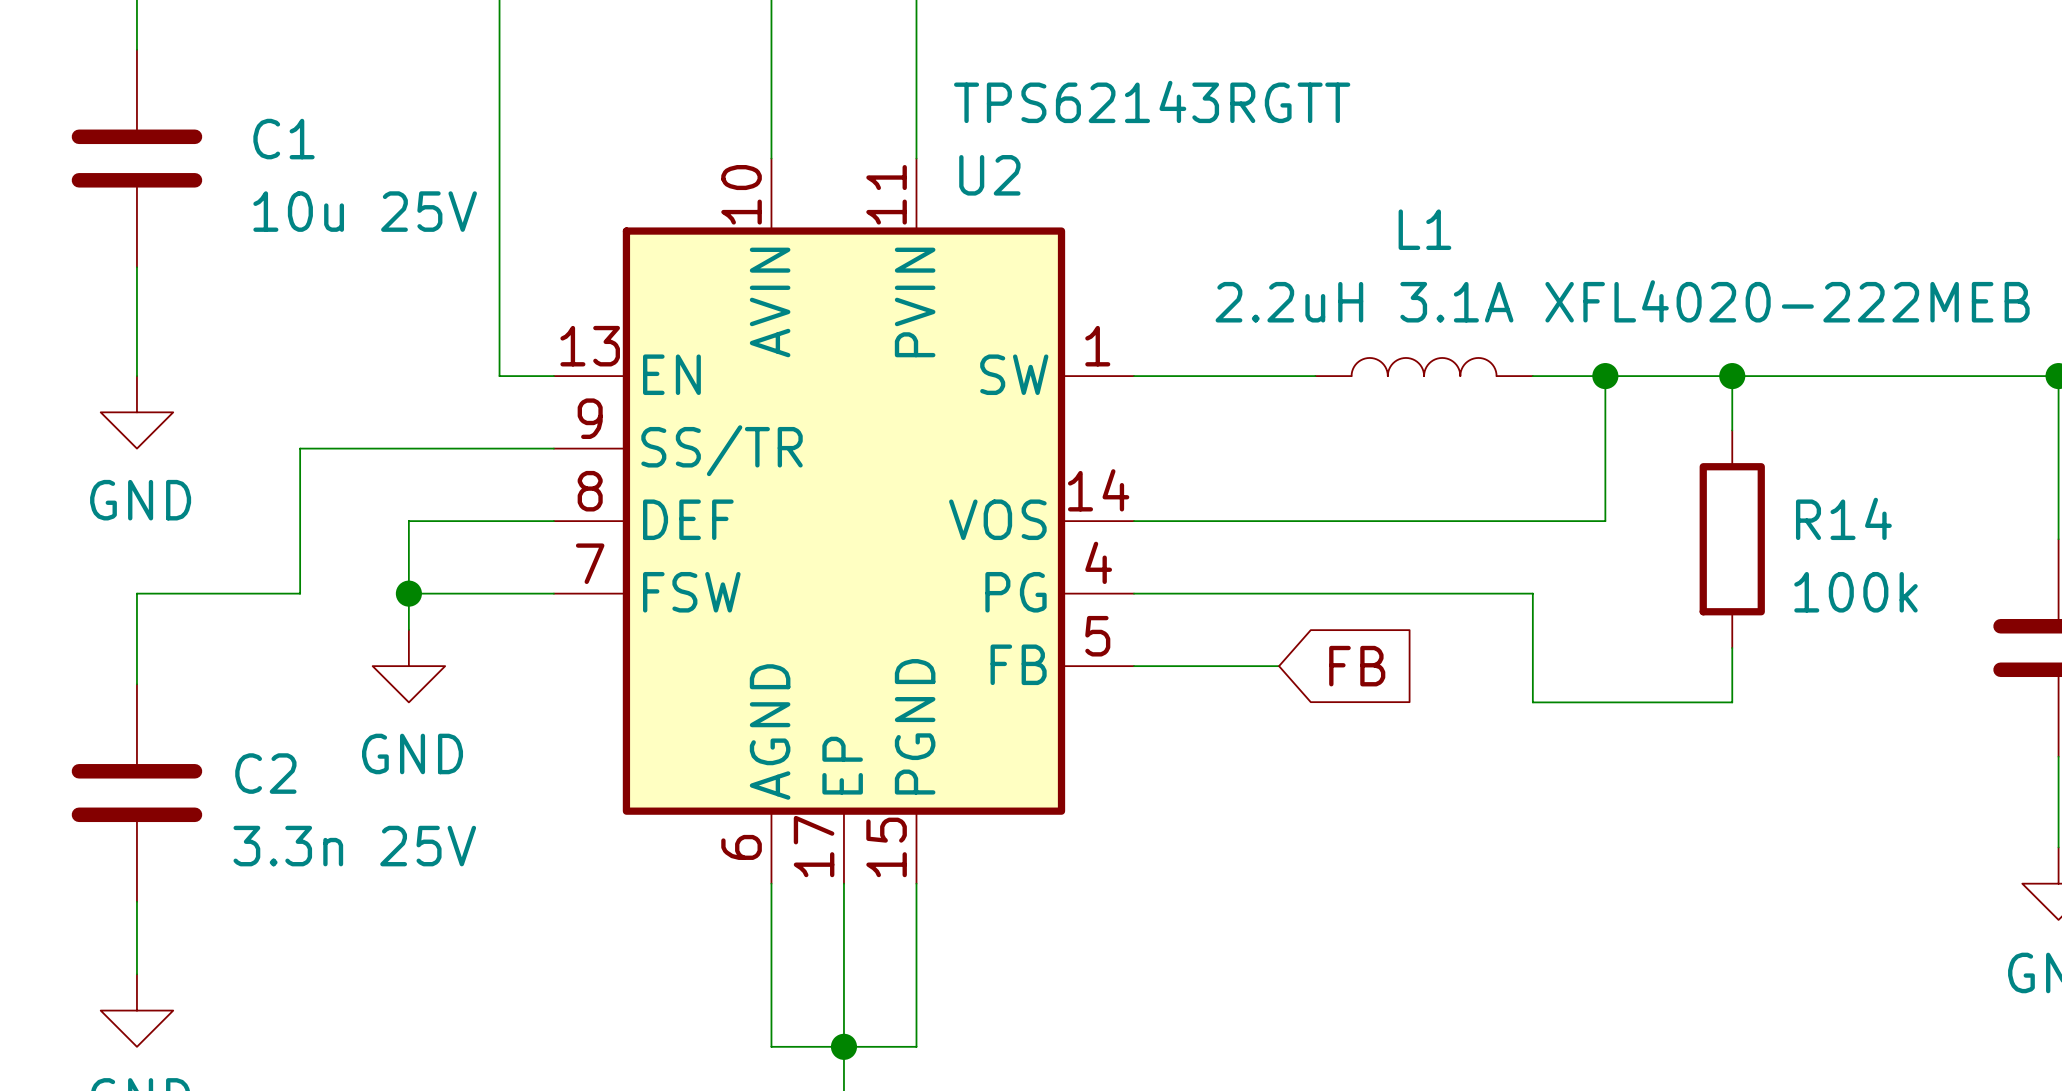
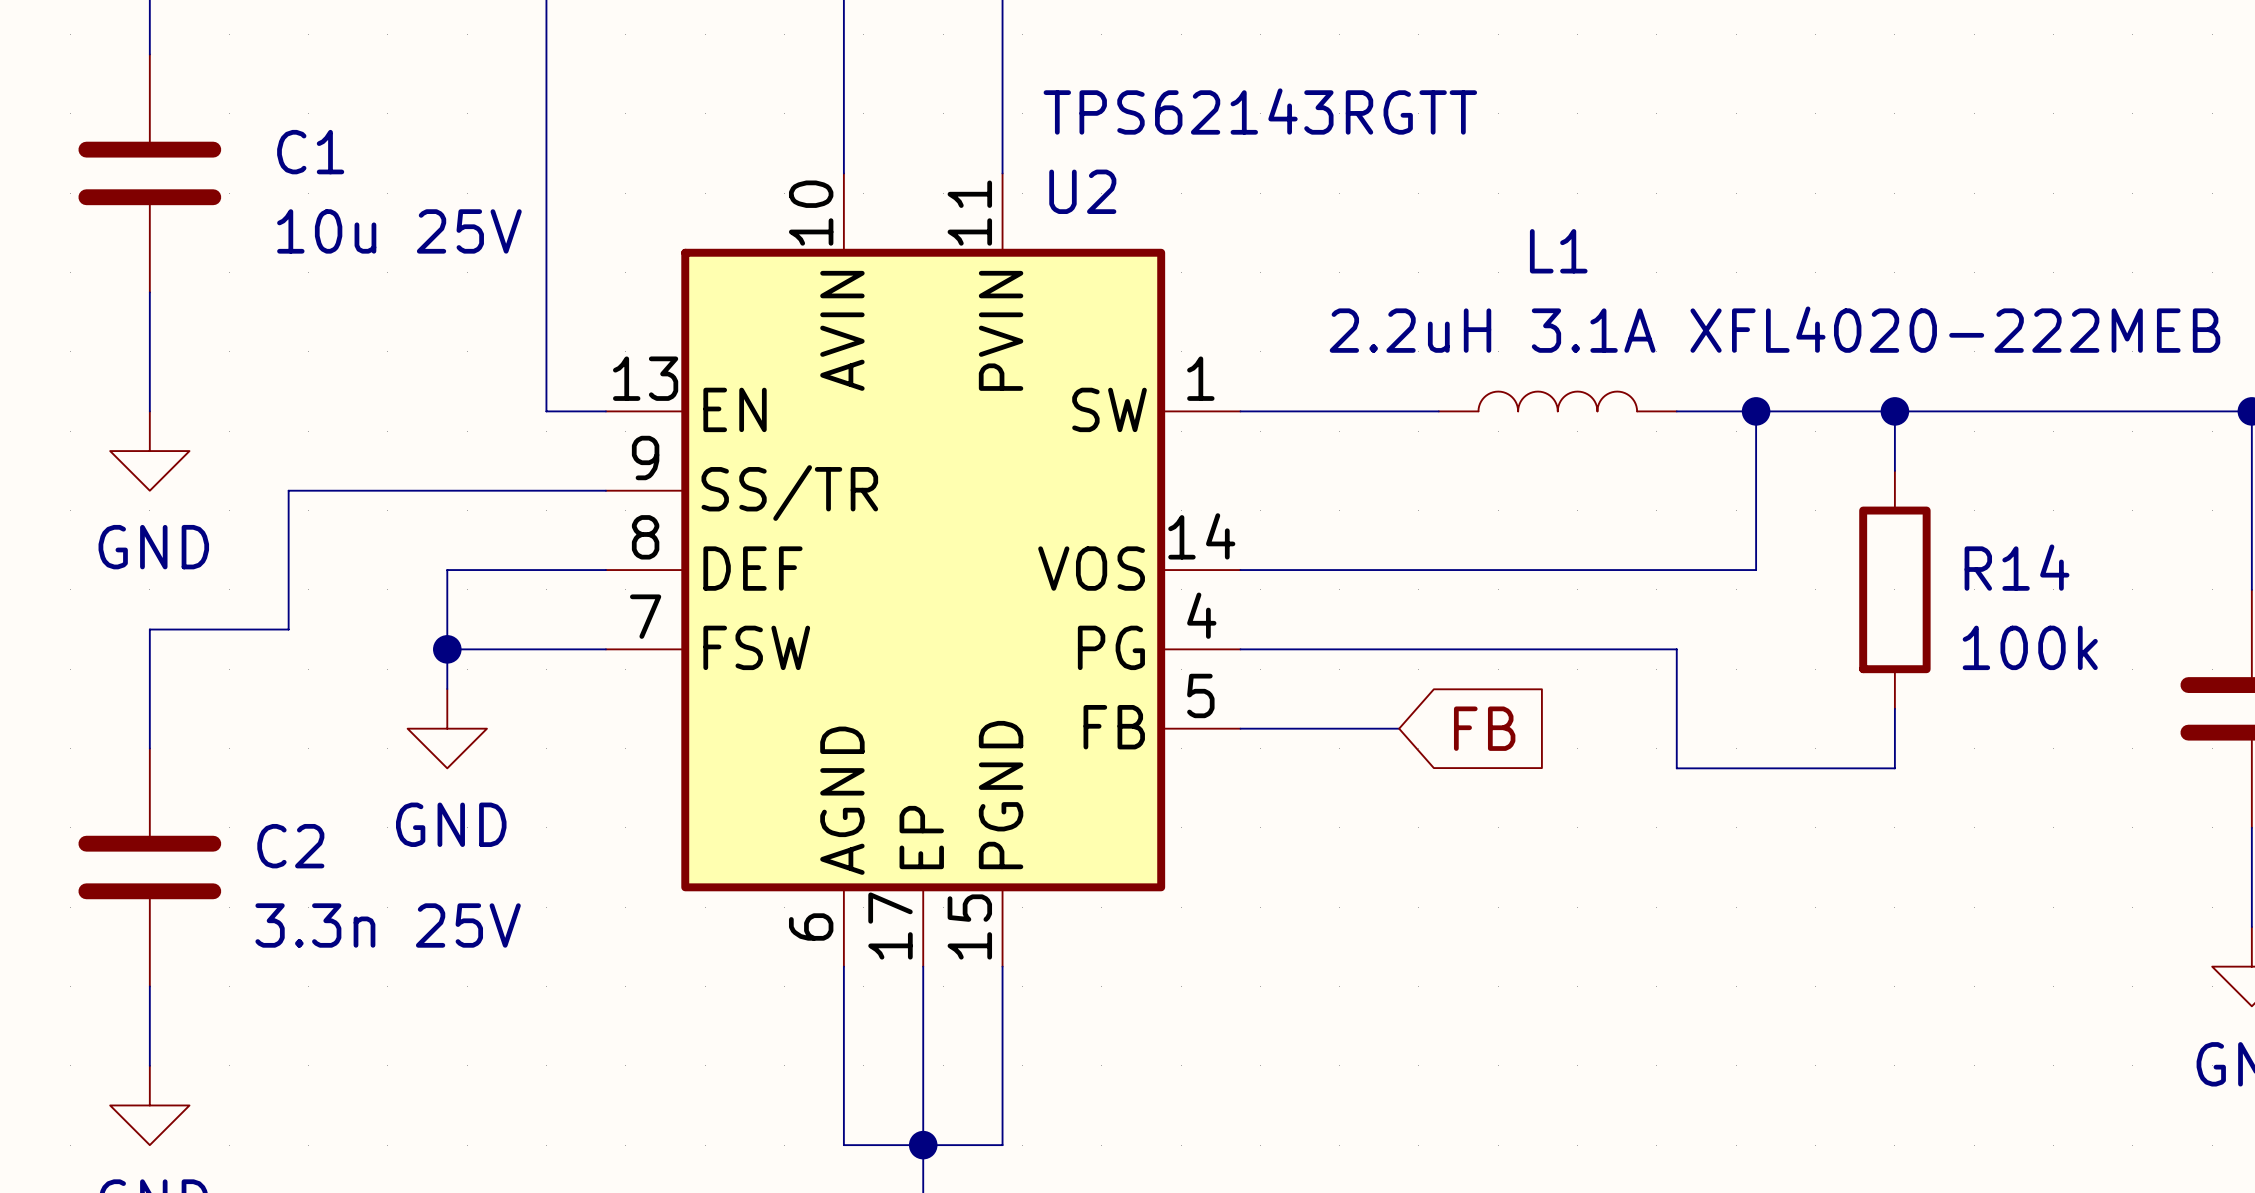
wire: (300, 448) (300, 593) (136, 593) -> (328, 490) (288, 490) (288, 629) (149, 629) (149, 649)

